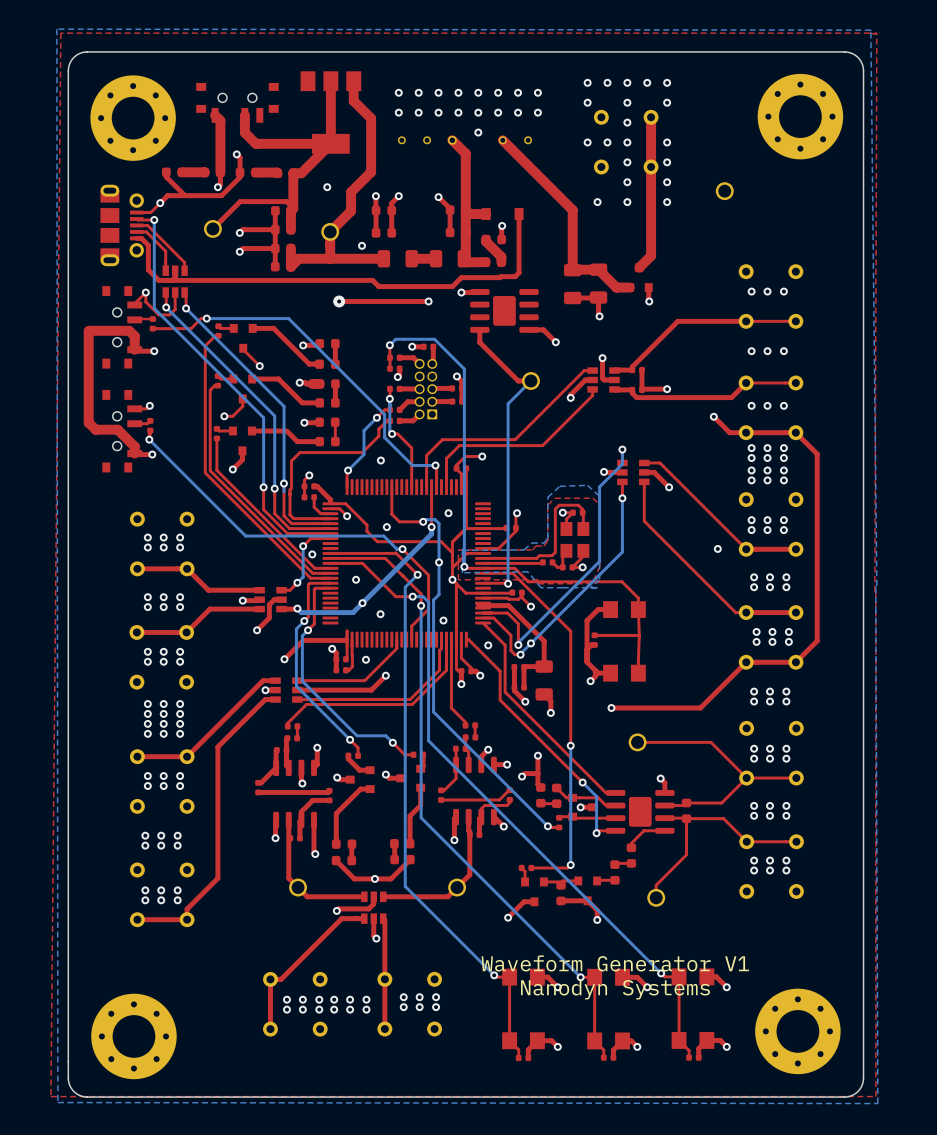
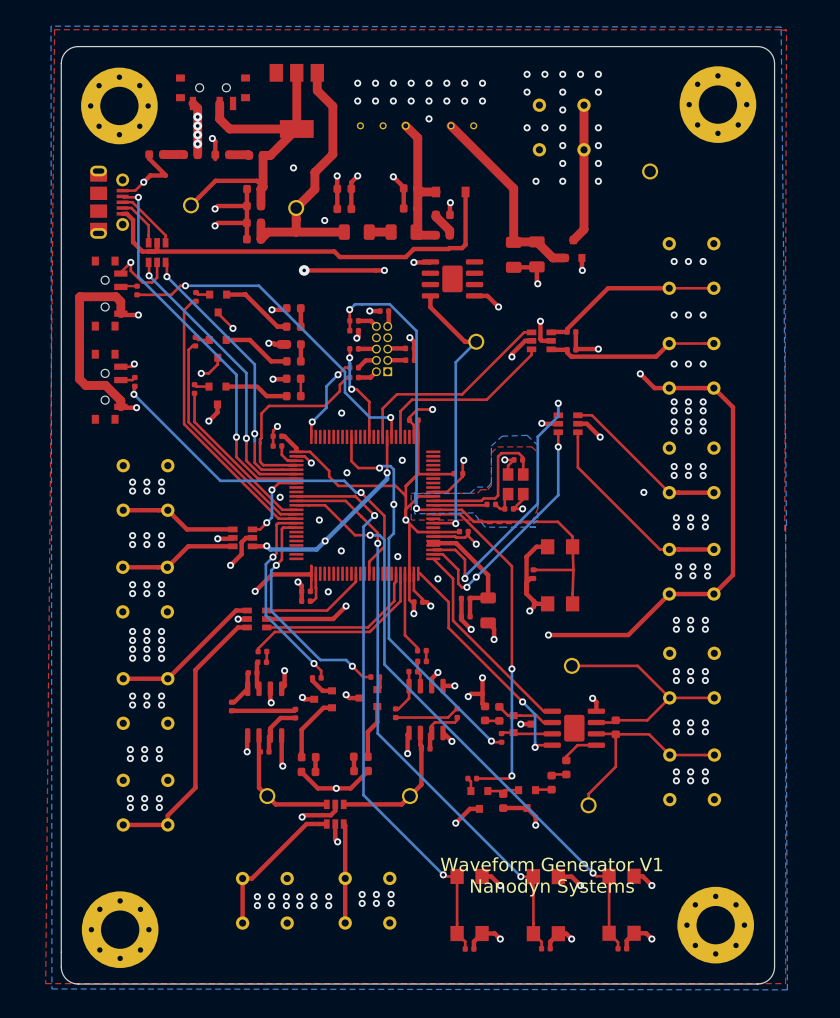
via: none -> (197, 116)
via: none -> (197, 125)
via: none -> (197, 134)
via: none -> (197, 144)
top track: (220, 172) (220, 184) (217, 187) -> none
top track: (240, 177) (221, 195) (184, 195) -> none
via: (217, 187) -> none

